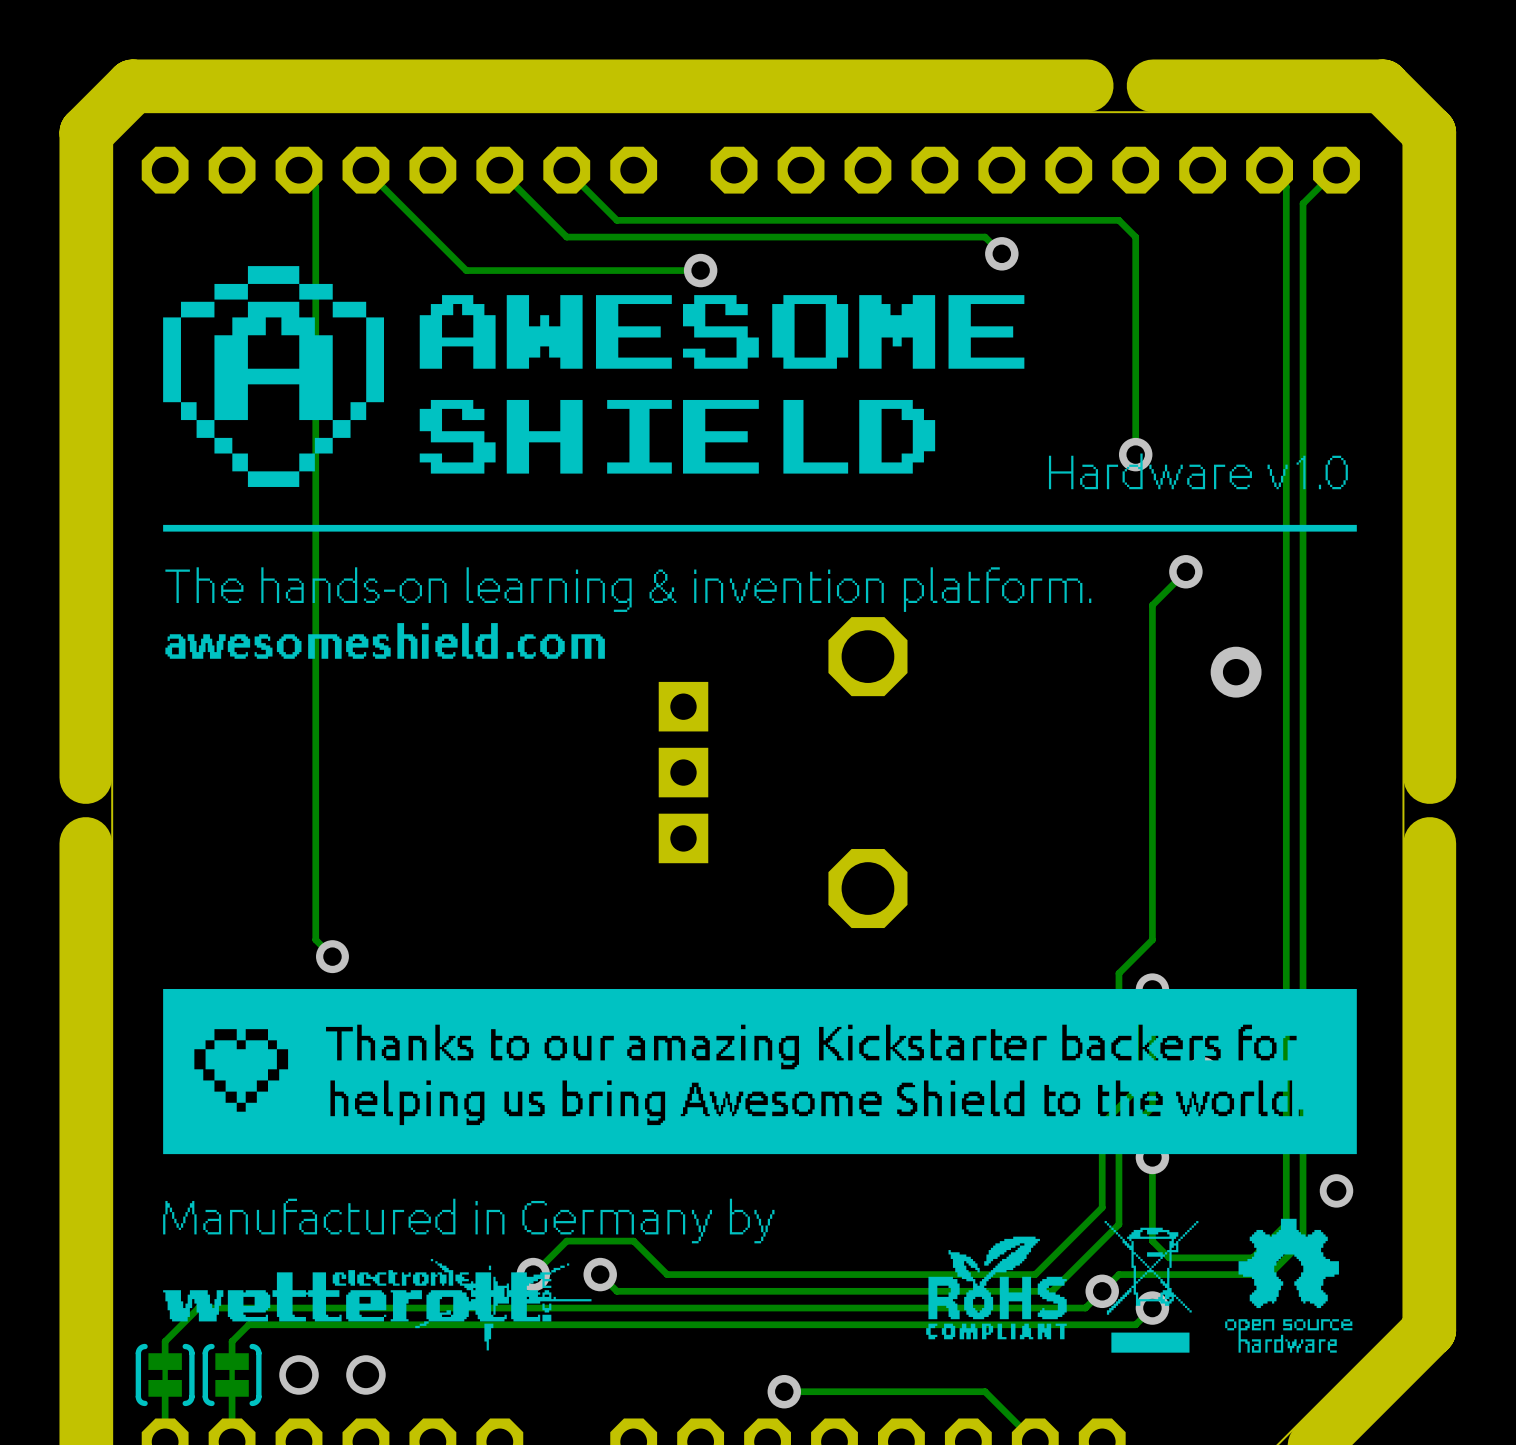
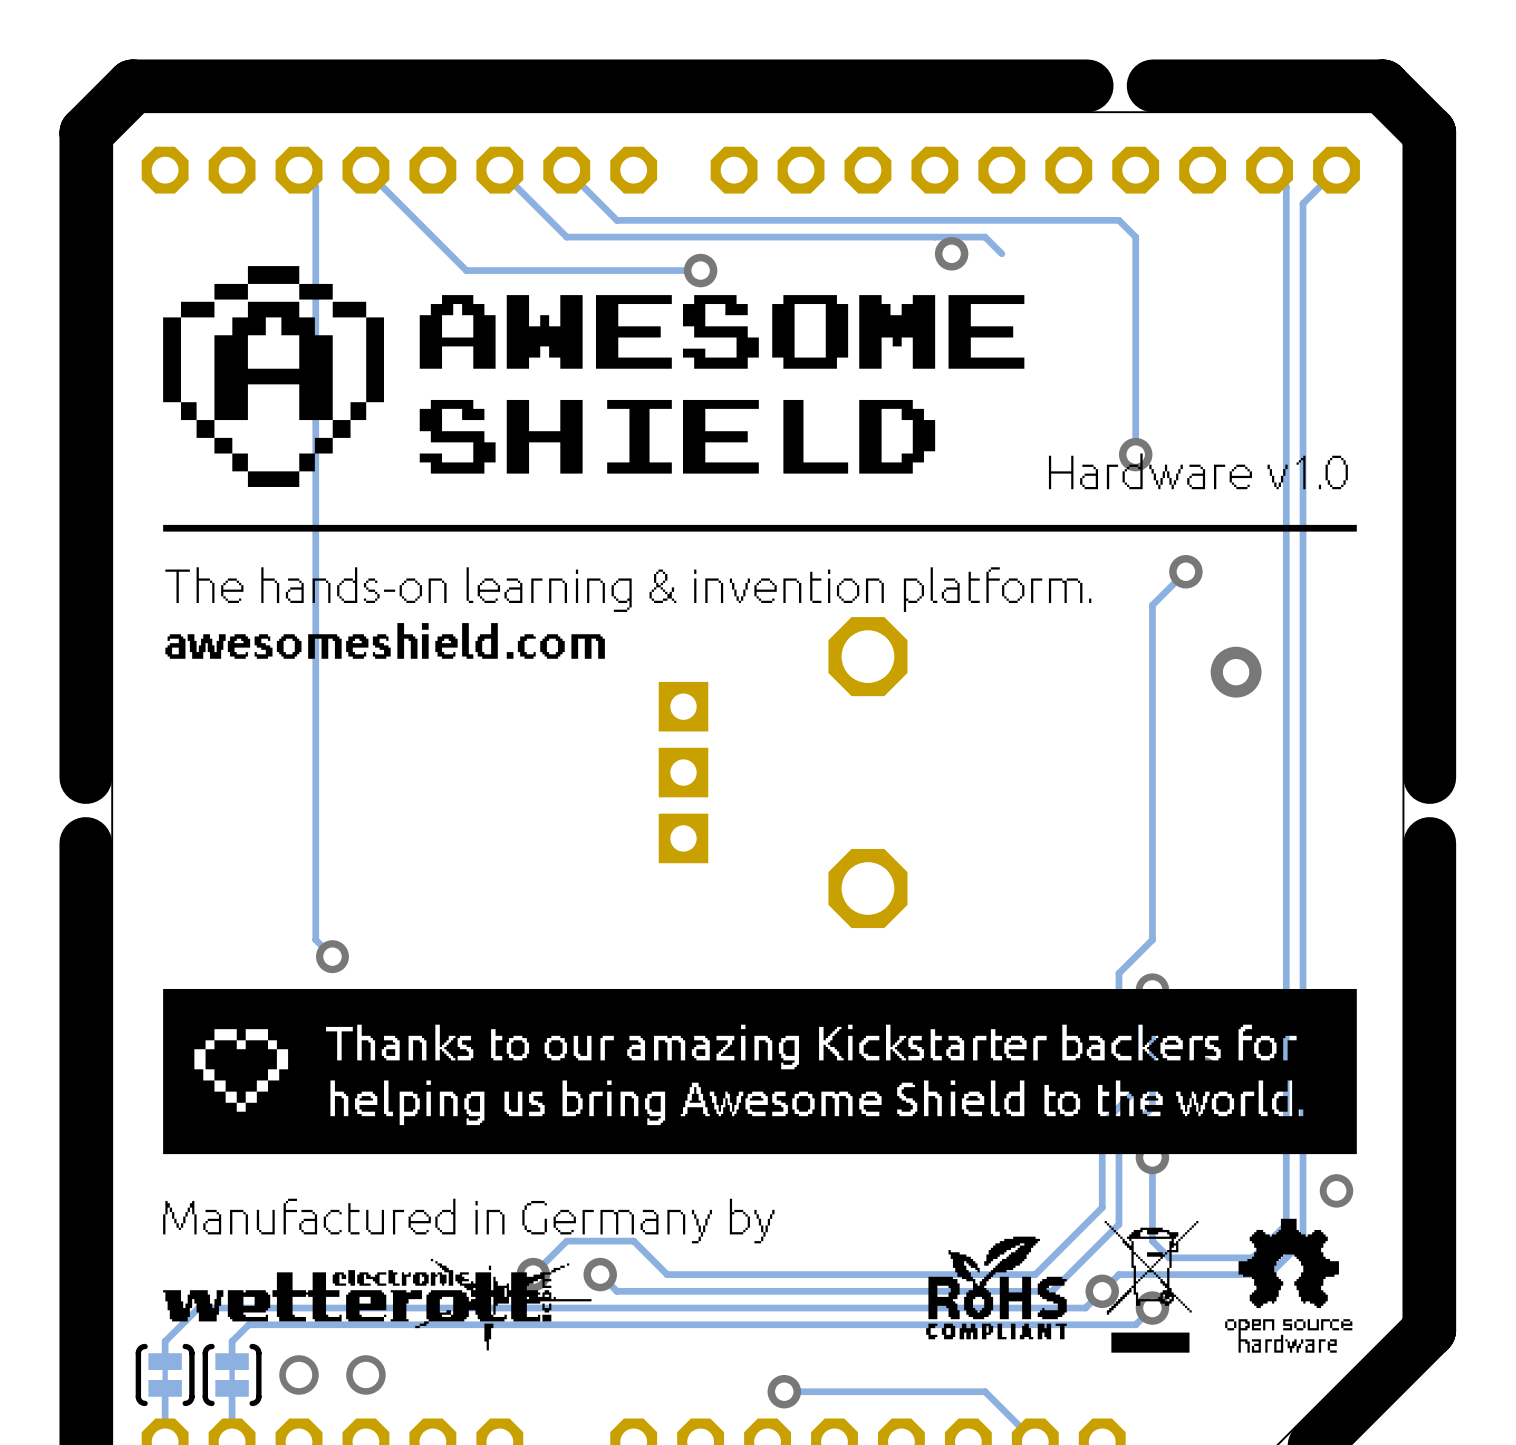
via position: (1001, 253) -> (951, 253)

